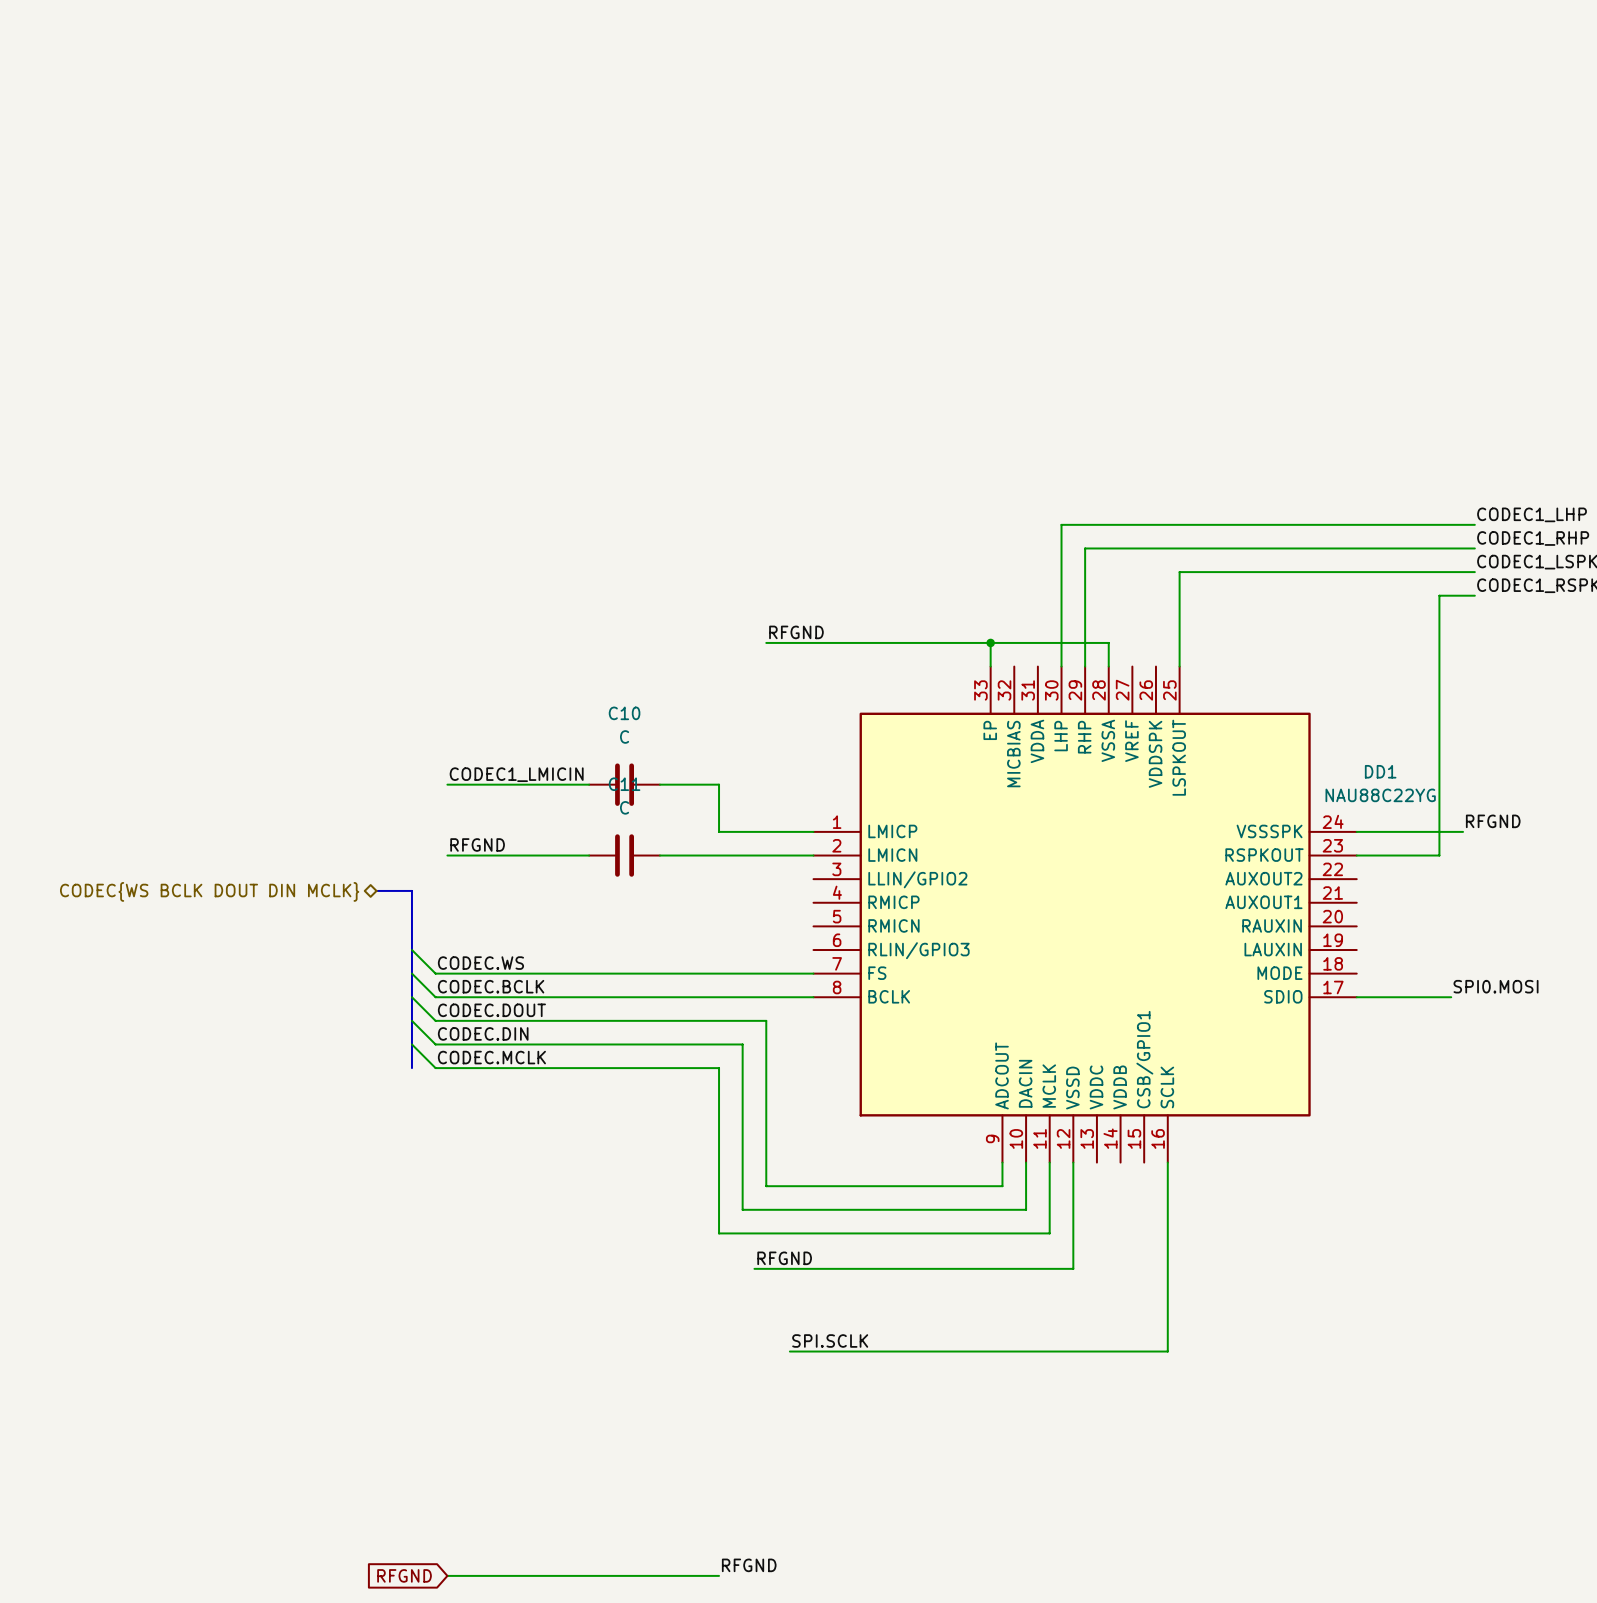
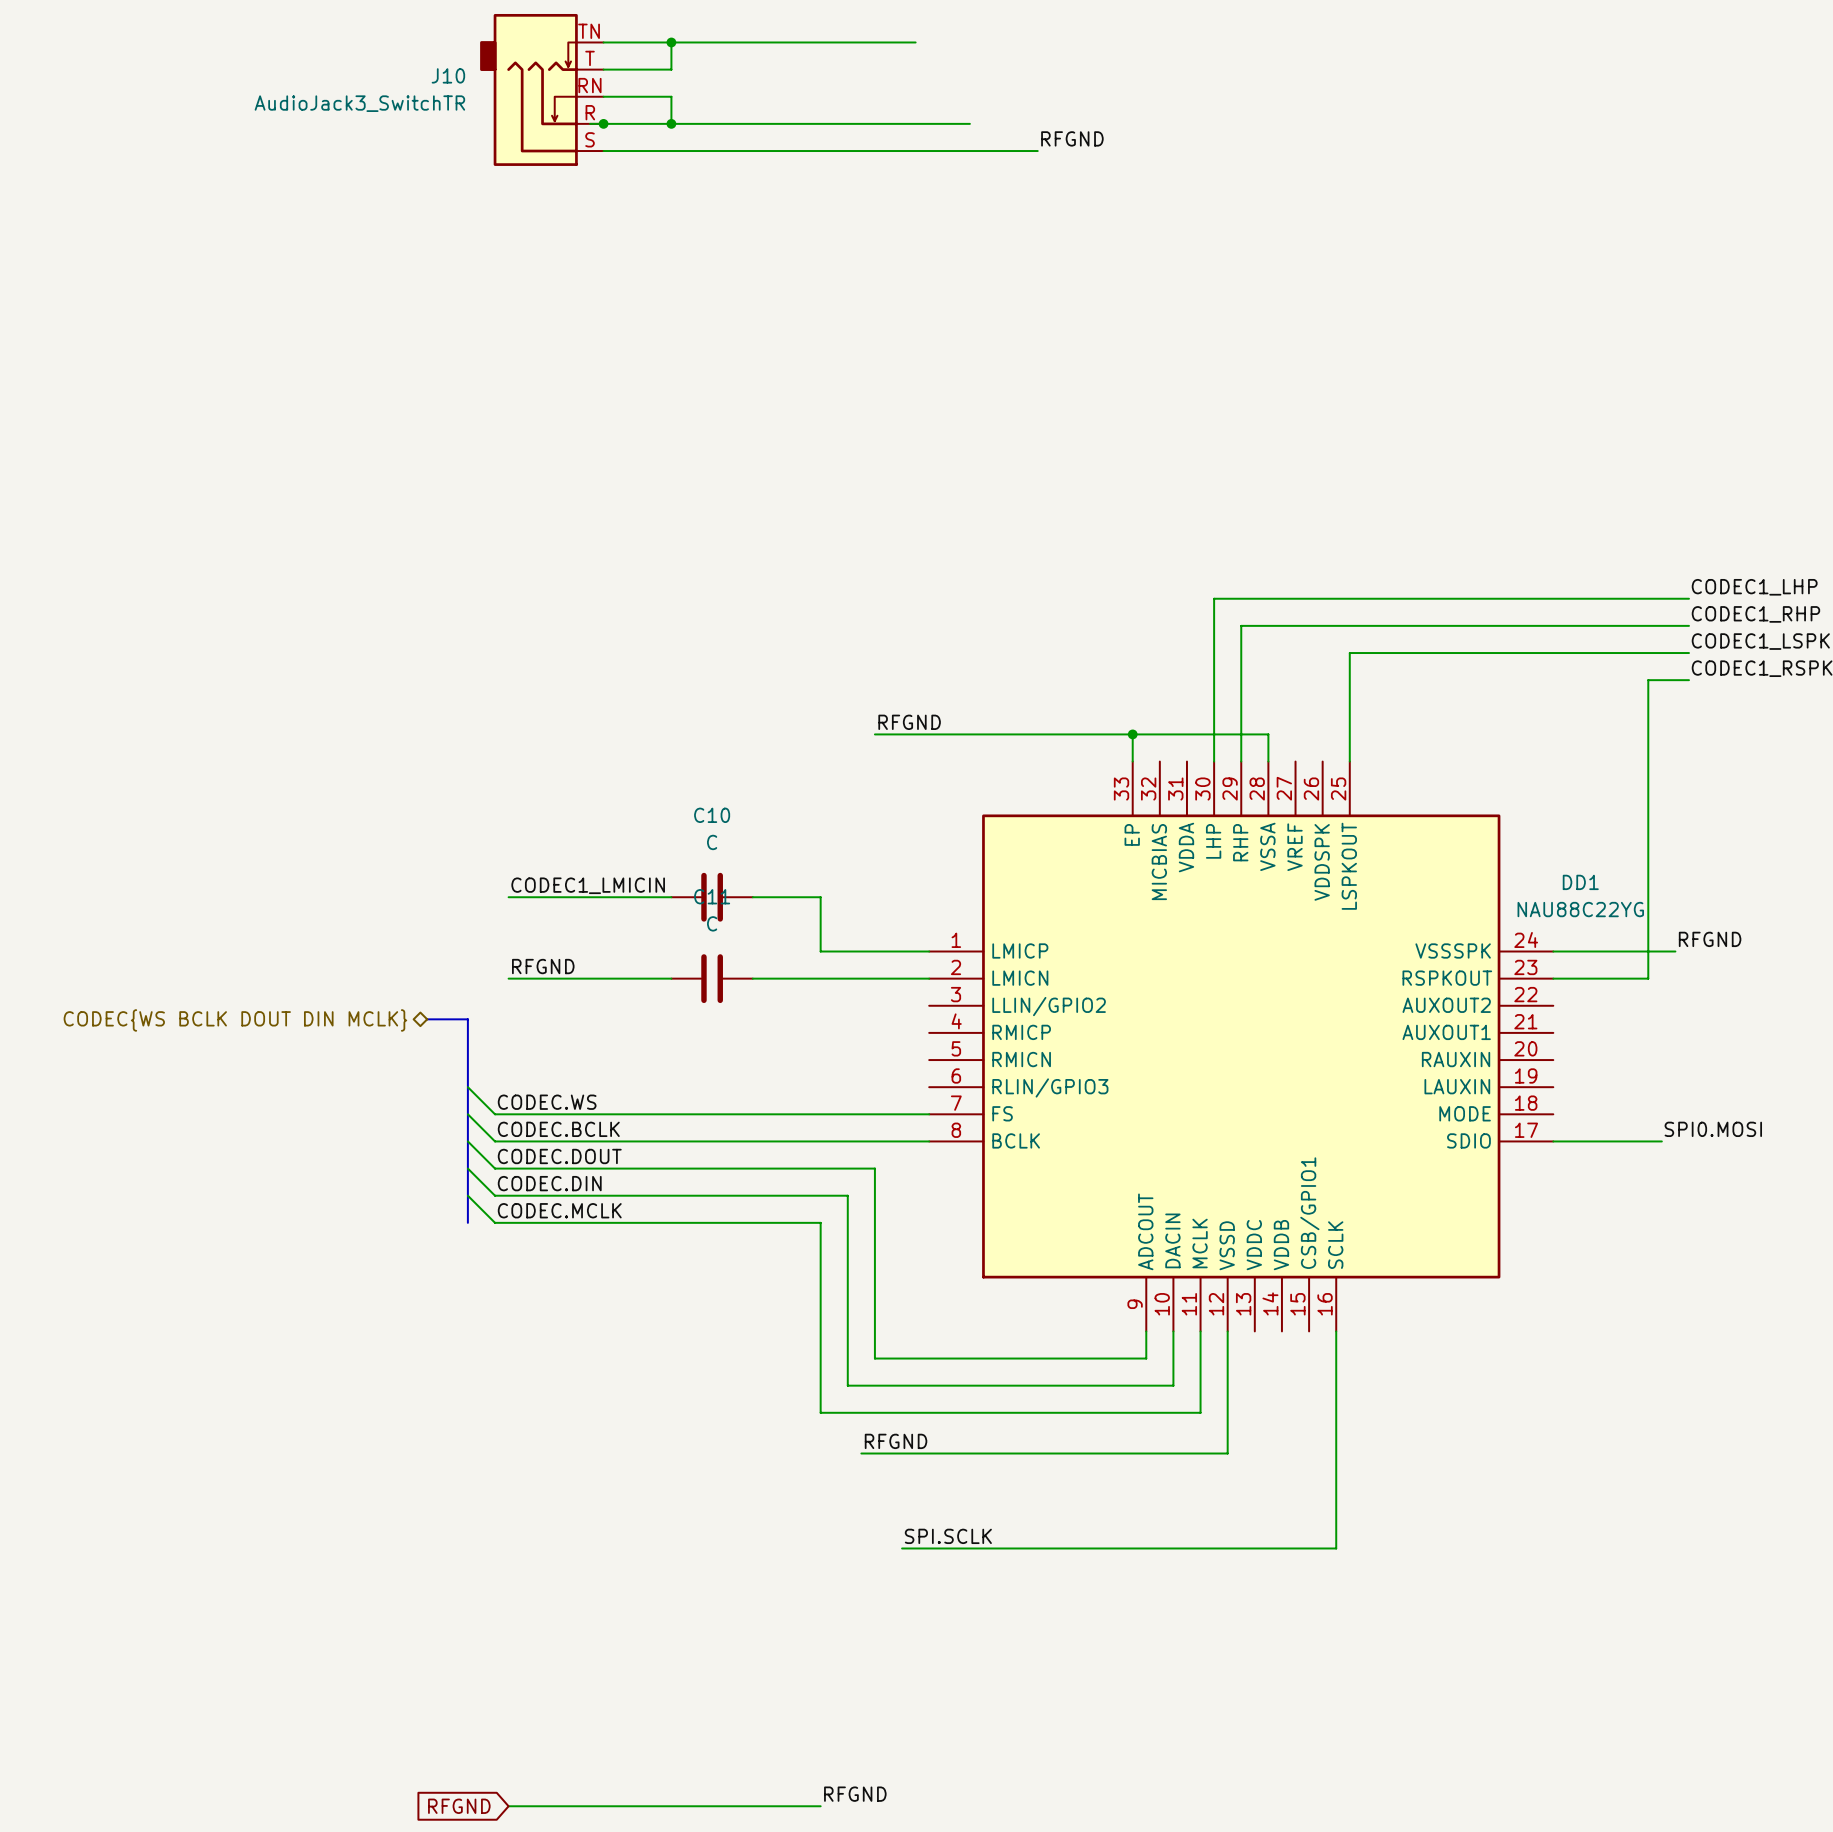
wire: none -> (603, 42) (915, 42)
wire: none -> (671, 42) (671, 69) (603, 69)
junction: none -> (671, 42)
J10: none -> AudioJack3_SwitchTR (541, 89)
wire: none -> (603, 96) (671, 96) (671, 123)
wire: none -> (590, 123) (969, 123)
junction: none -> (603, 123)
junction: none -> (671, 123)
label: none -> RFGND (1072, 138)
wire: none -> (603, 151) (1037, 151)

